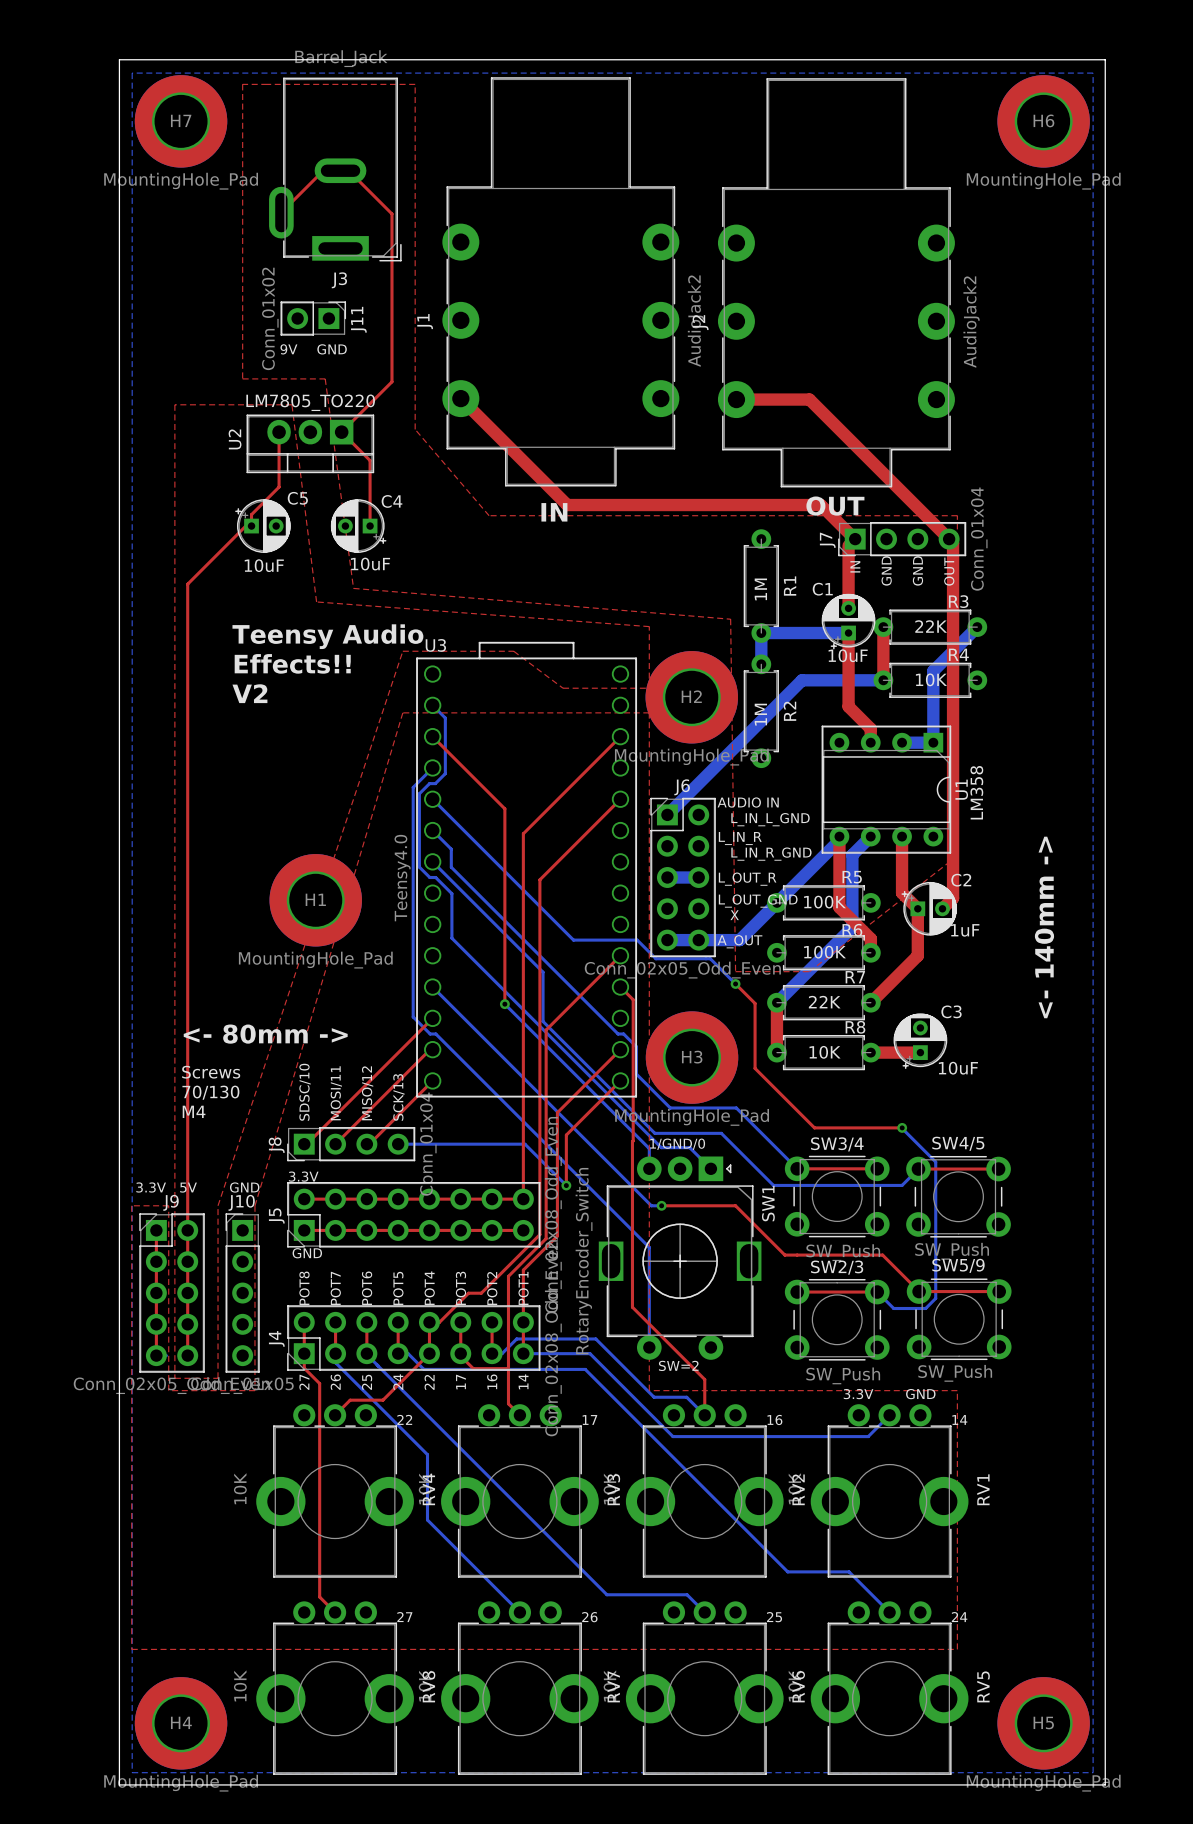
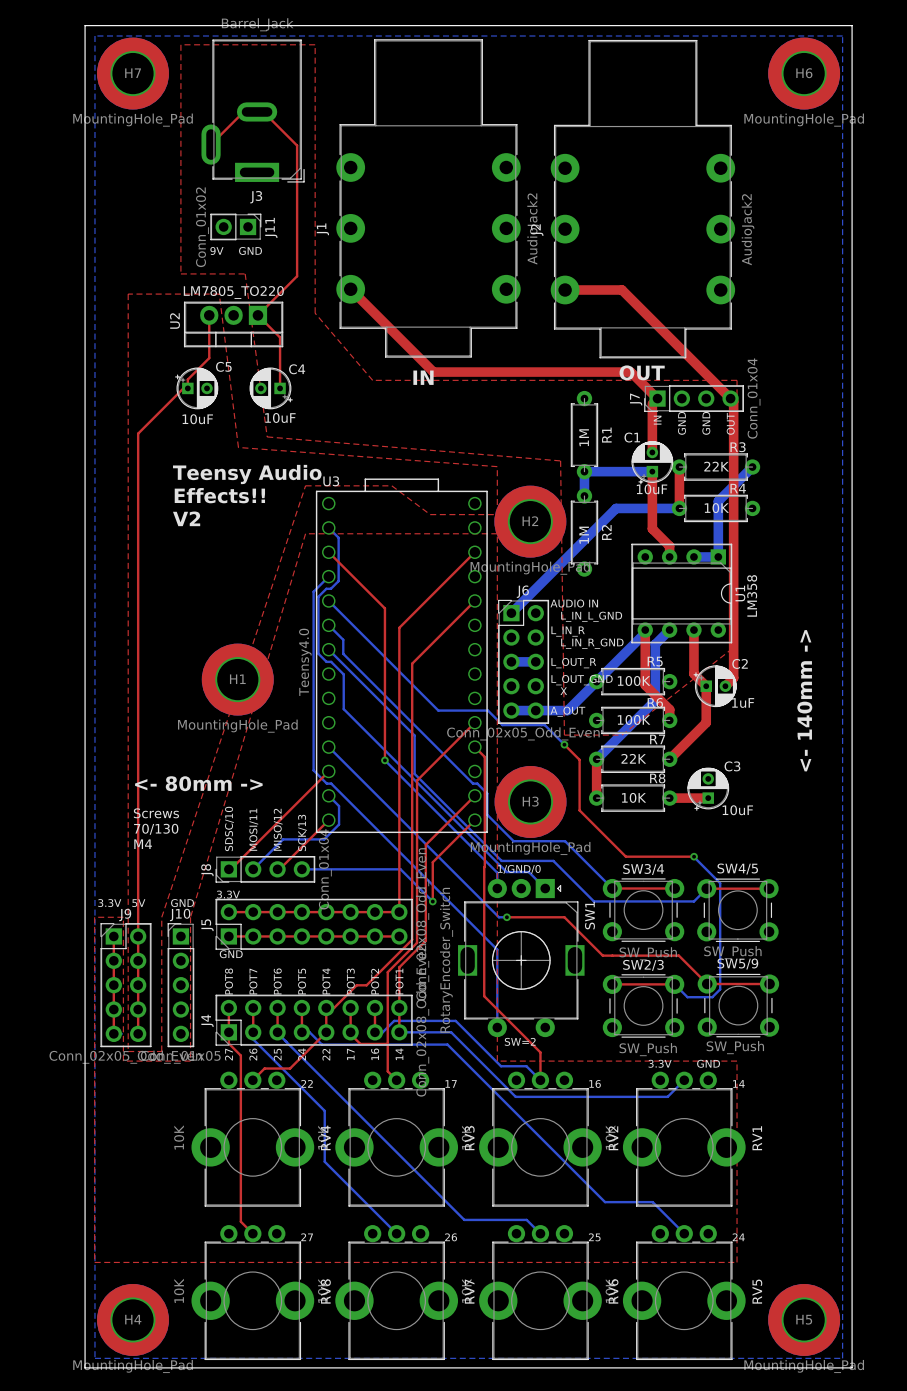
top track: (432, 1049) (430, 1049) (335, 1144) -> none
bottom track: none -> (328, 795) (339, 806) (339, 824) (324, 839) (283, 839) (253, 869)

